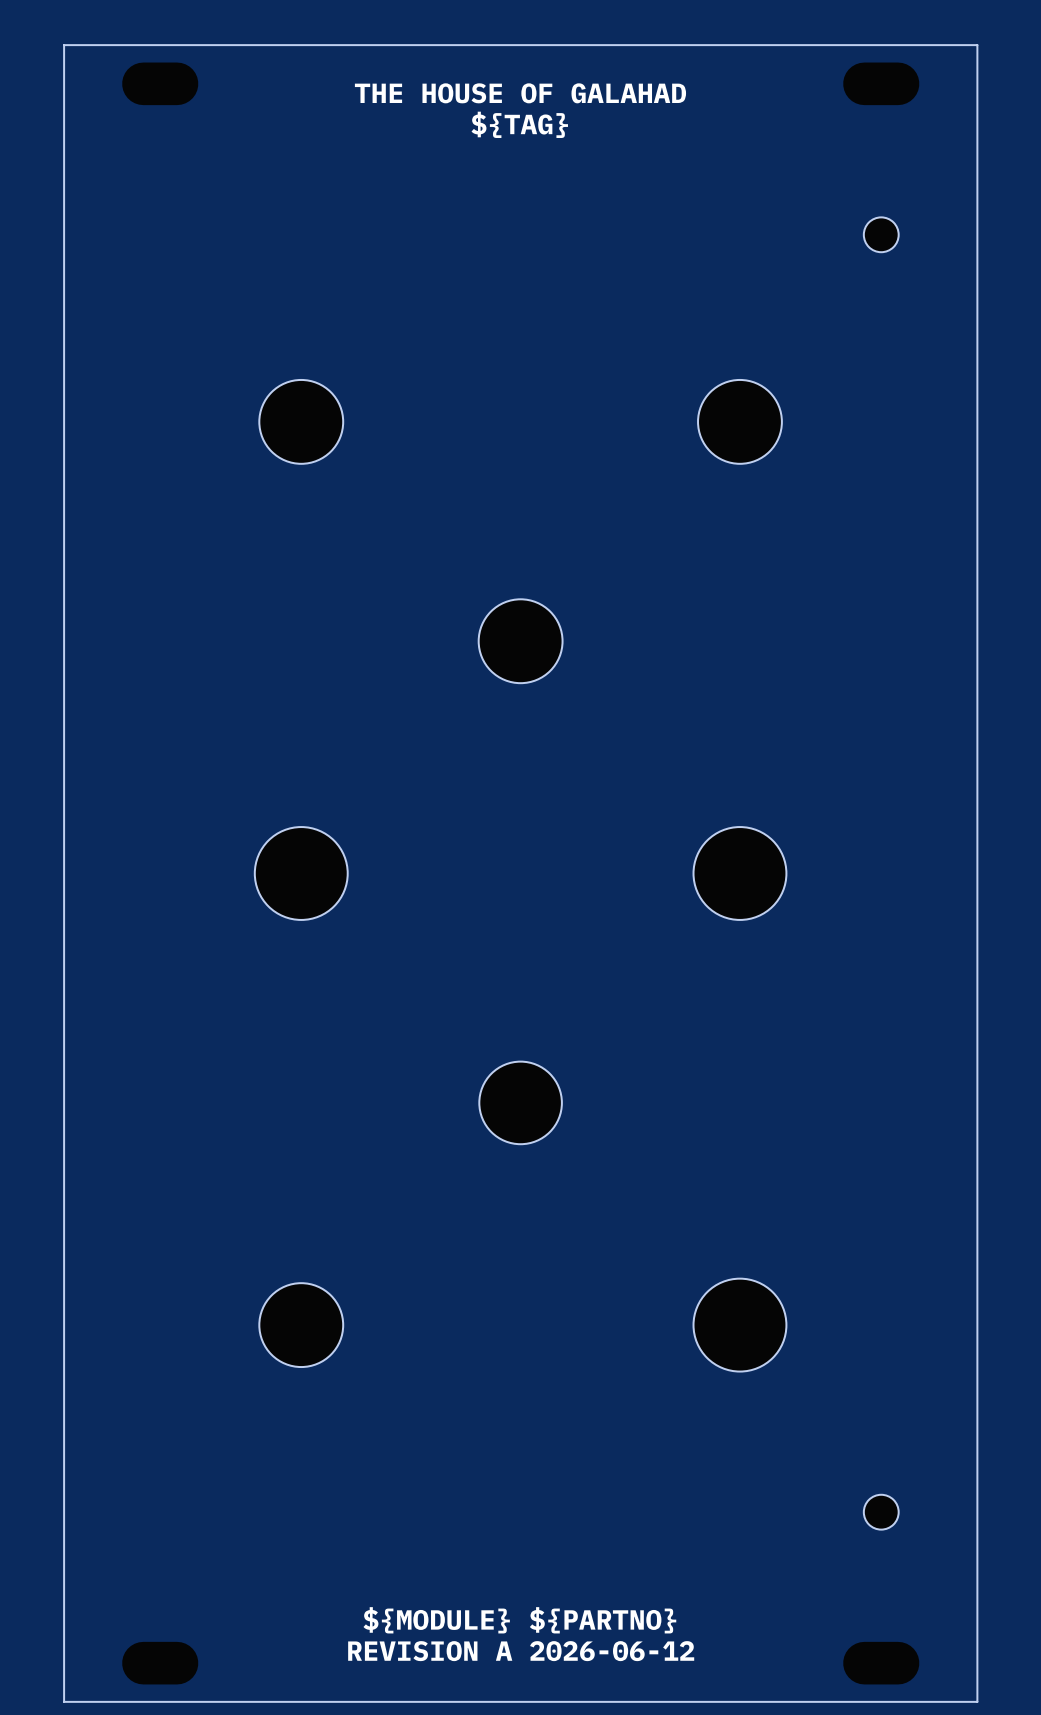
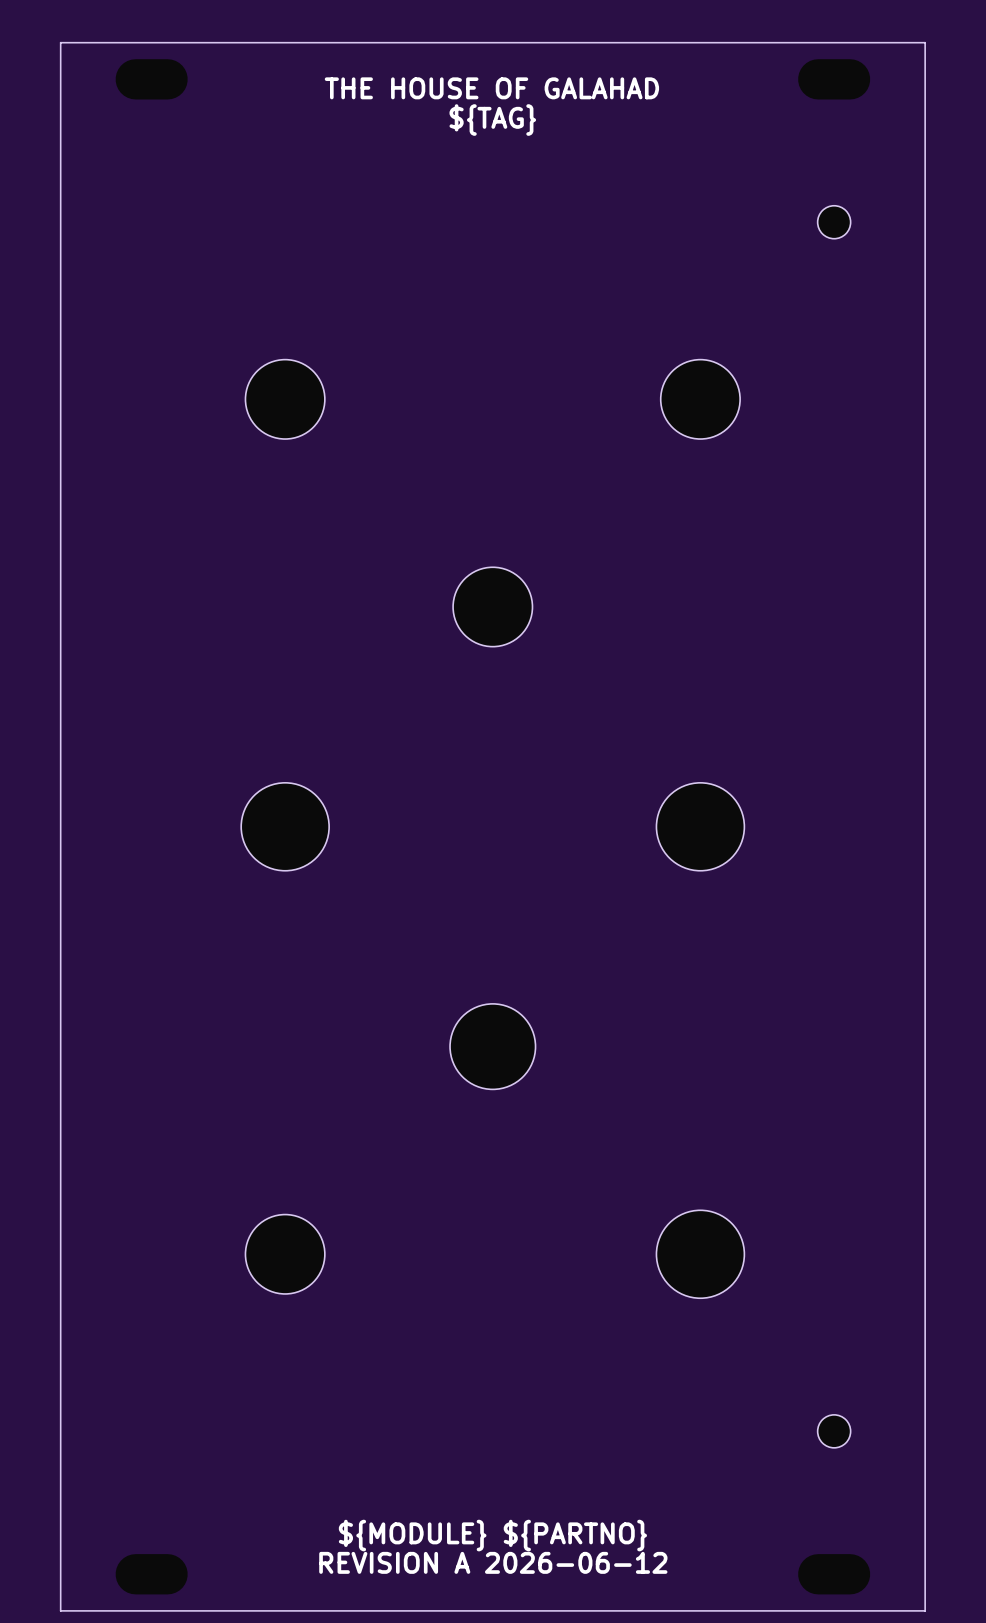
part footprint: [479, 1061, 562, 1145] -> [450, 1003, 536, 1090]

